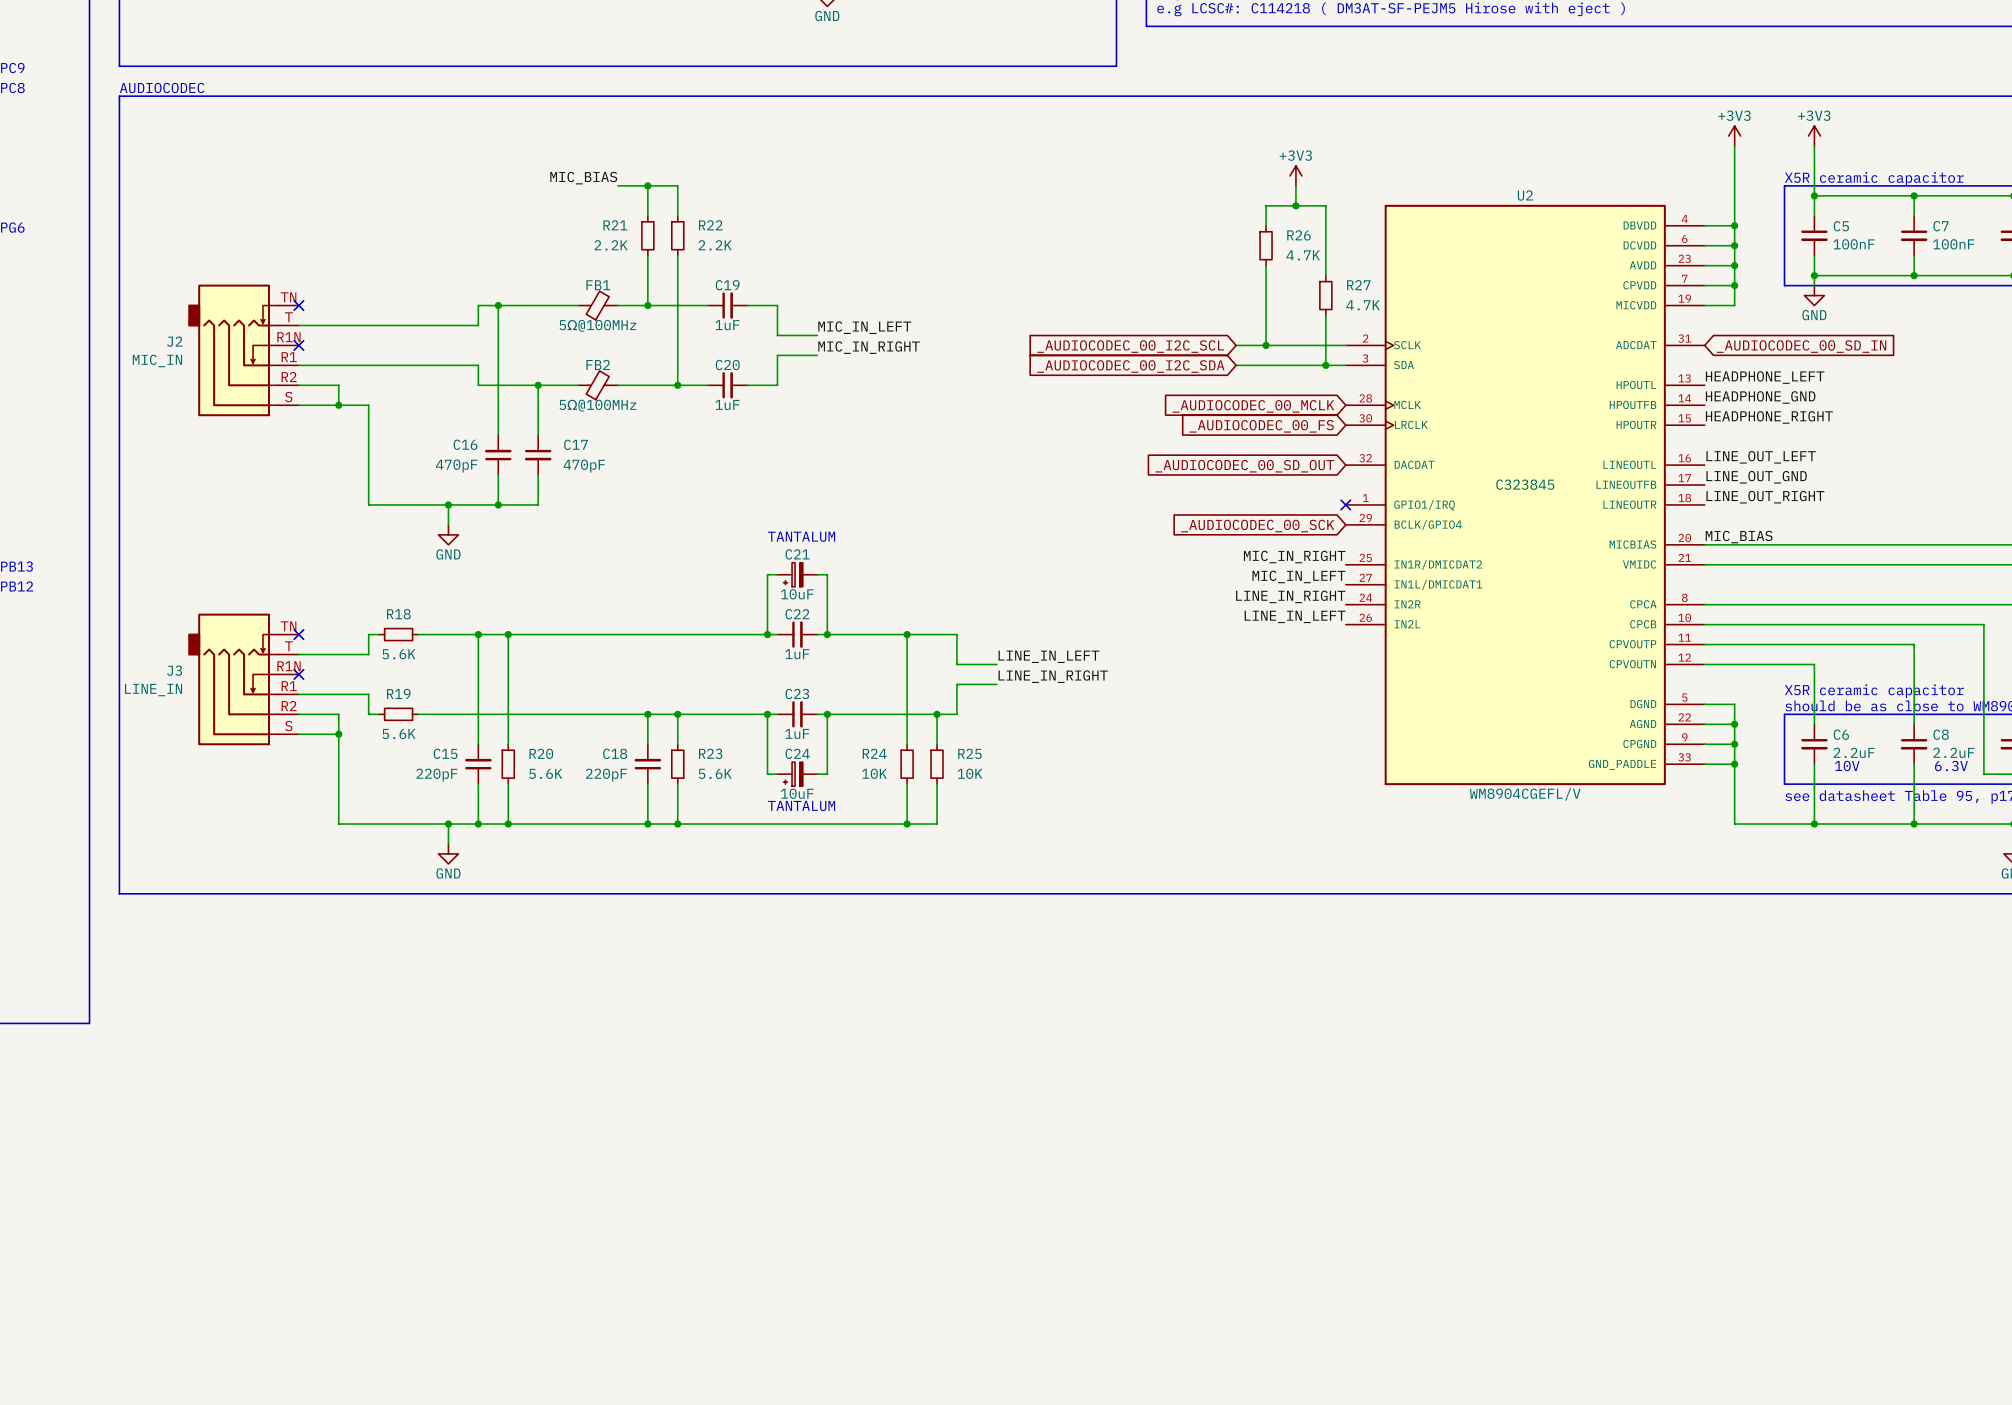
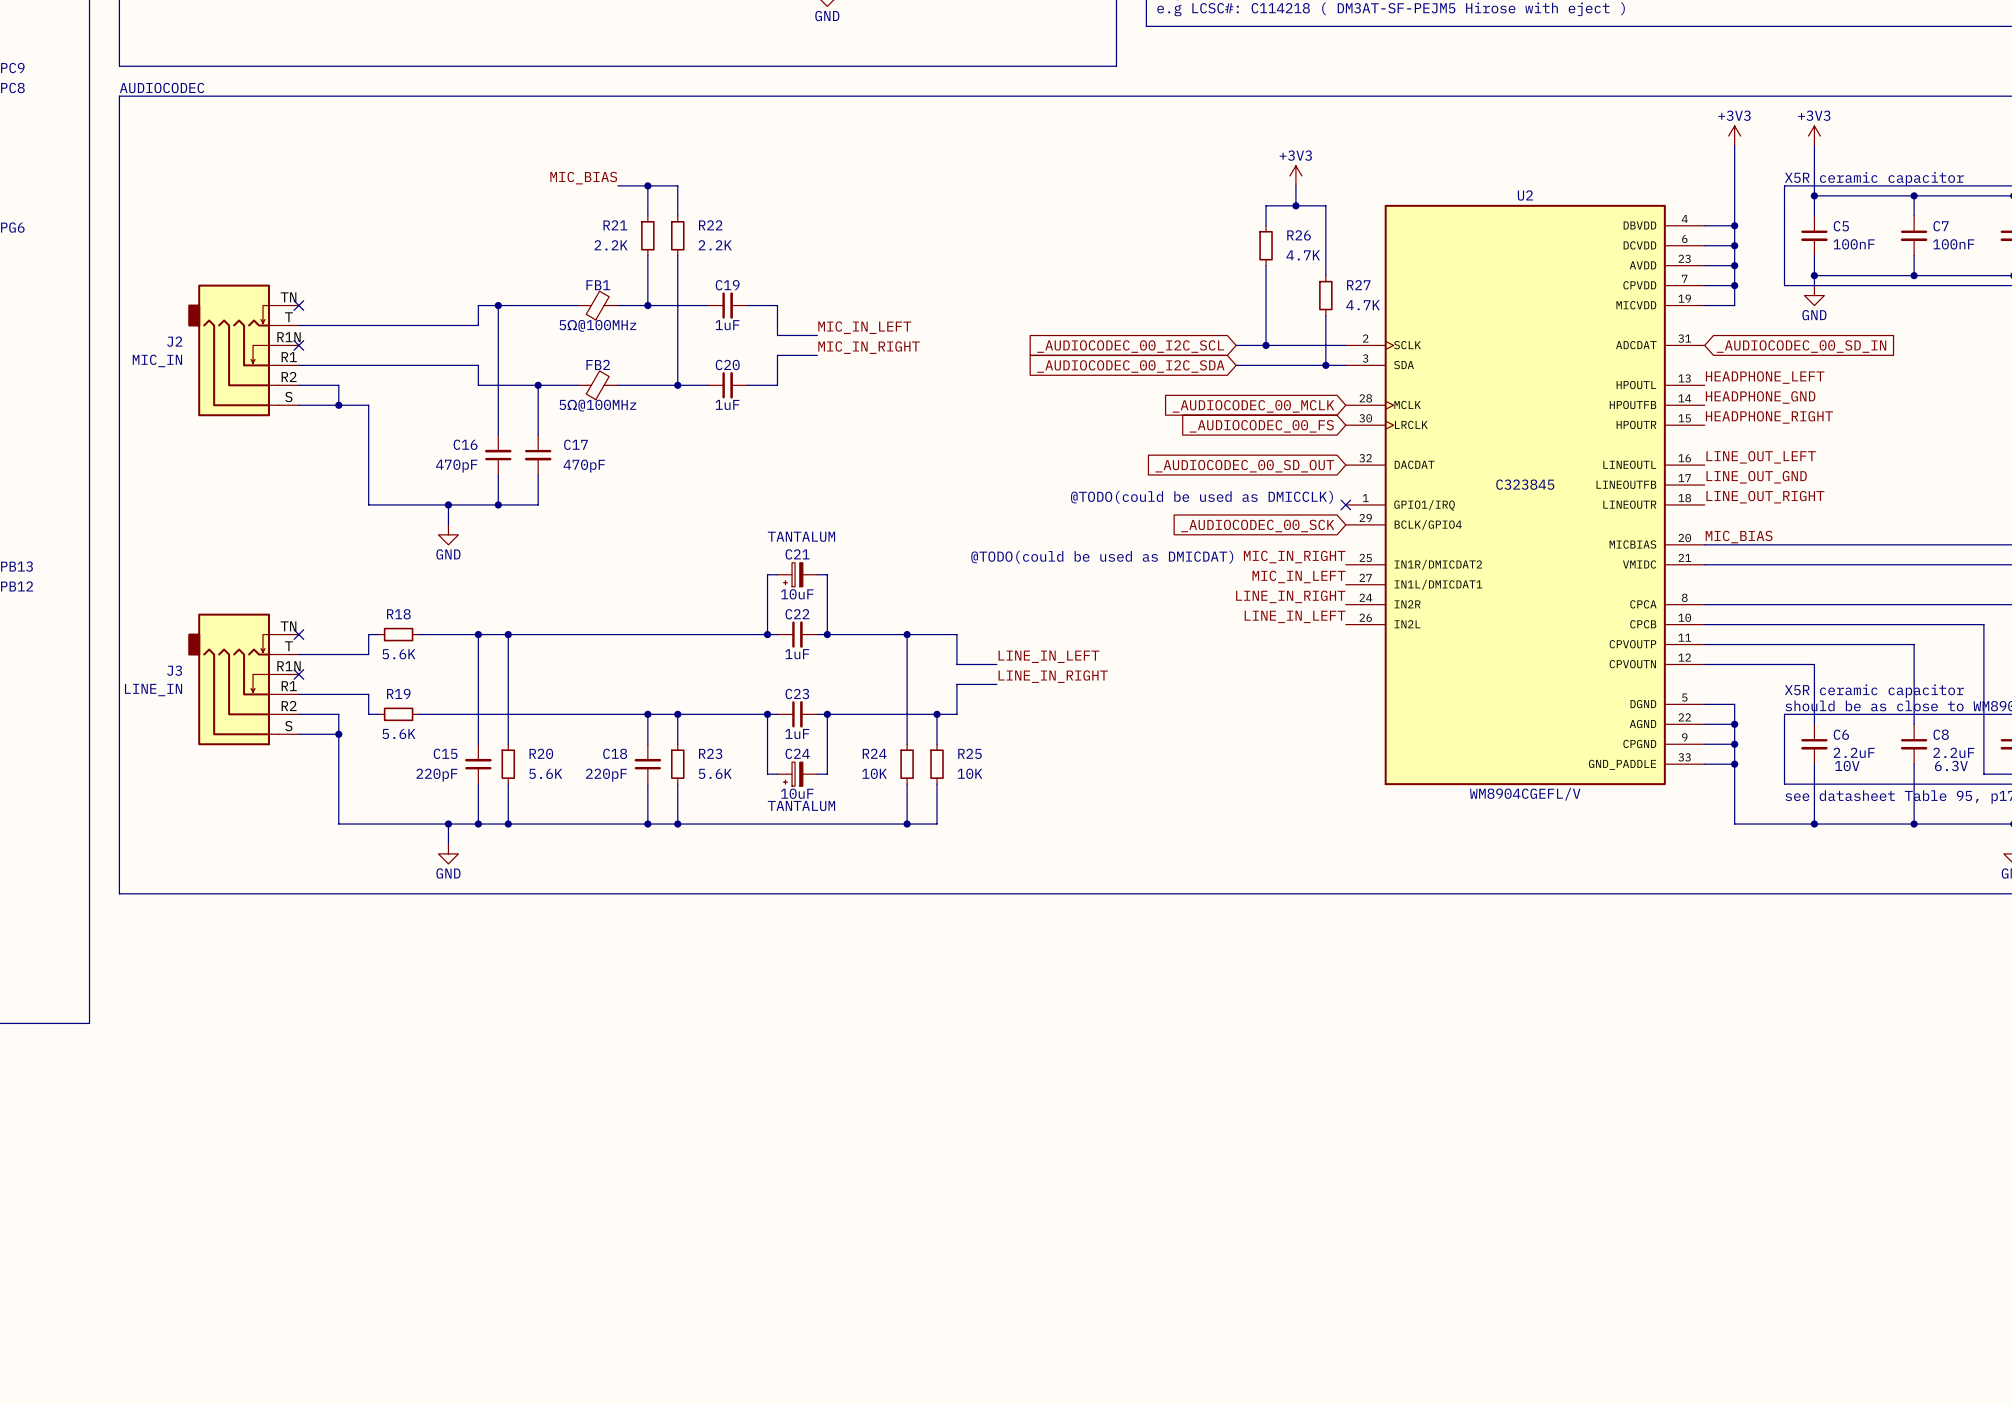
text: none -> @TODO(could be used as DMICCLK) (1201, 497)
text: none -> @TODO(could be used as DMICDAT) (1102, 557)

